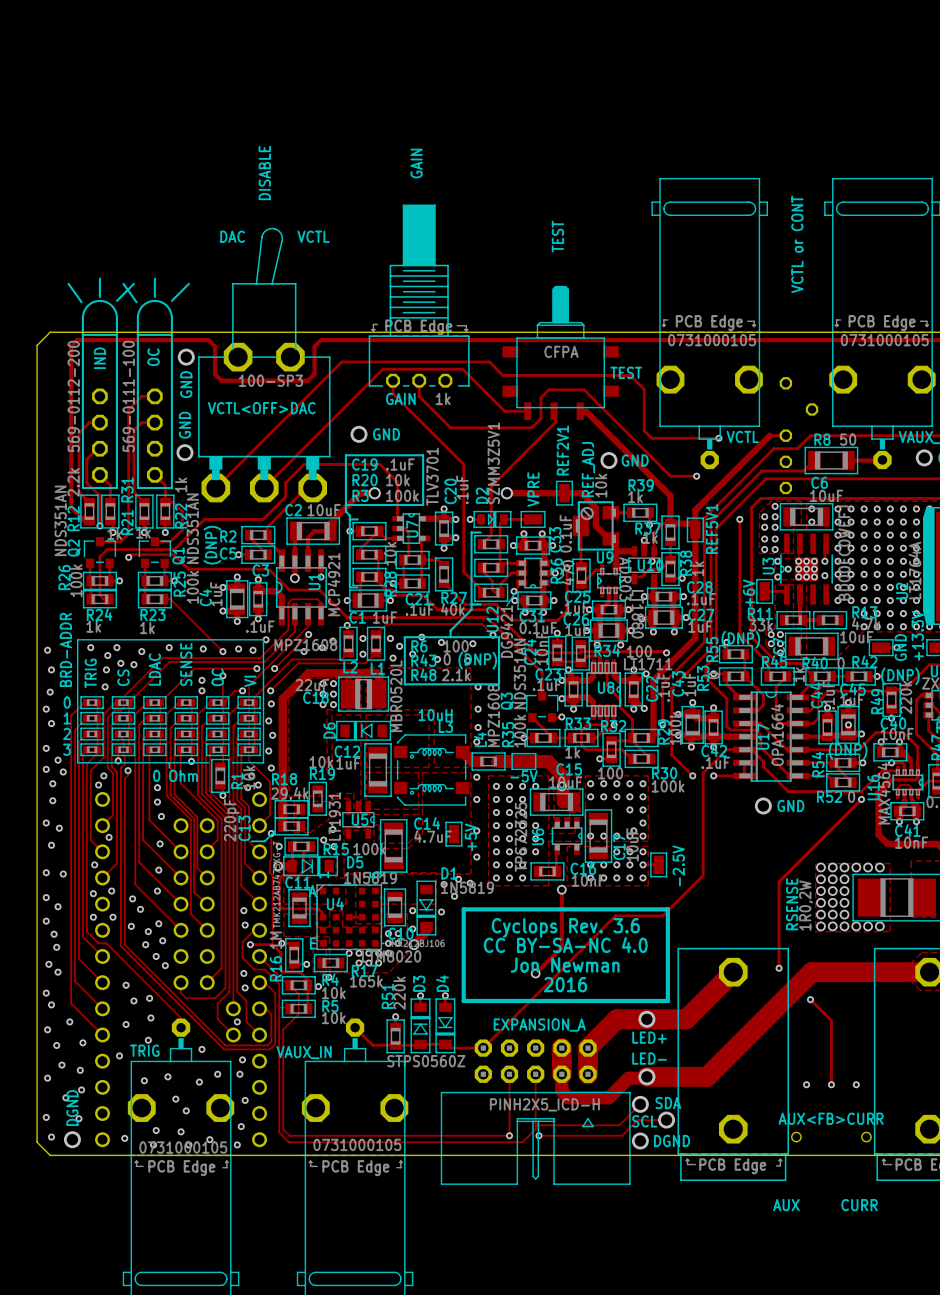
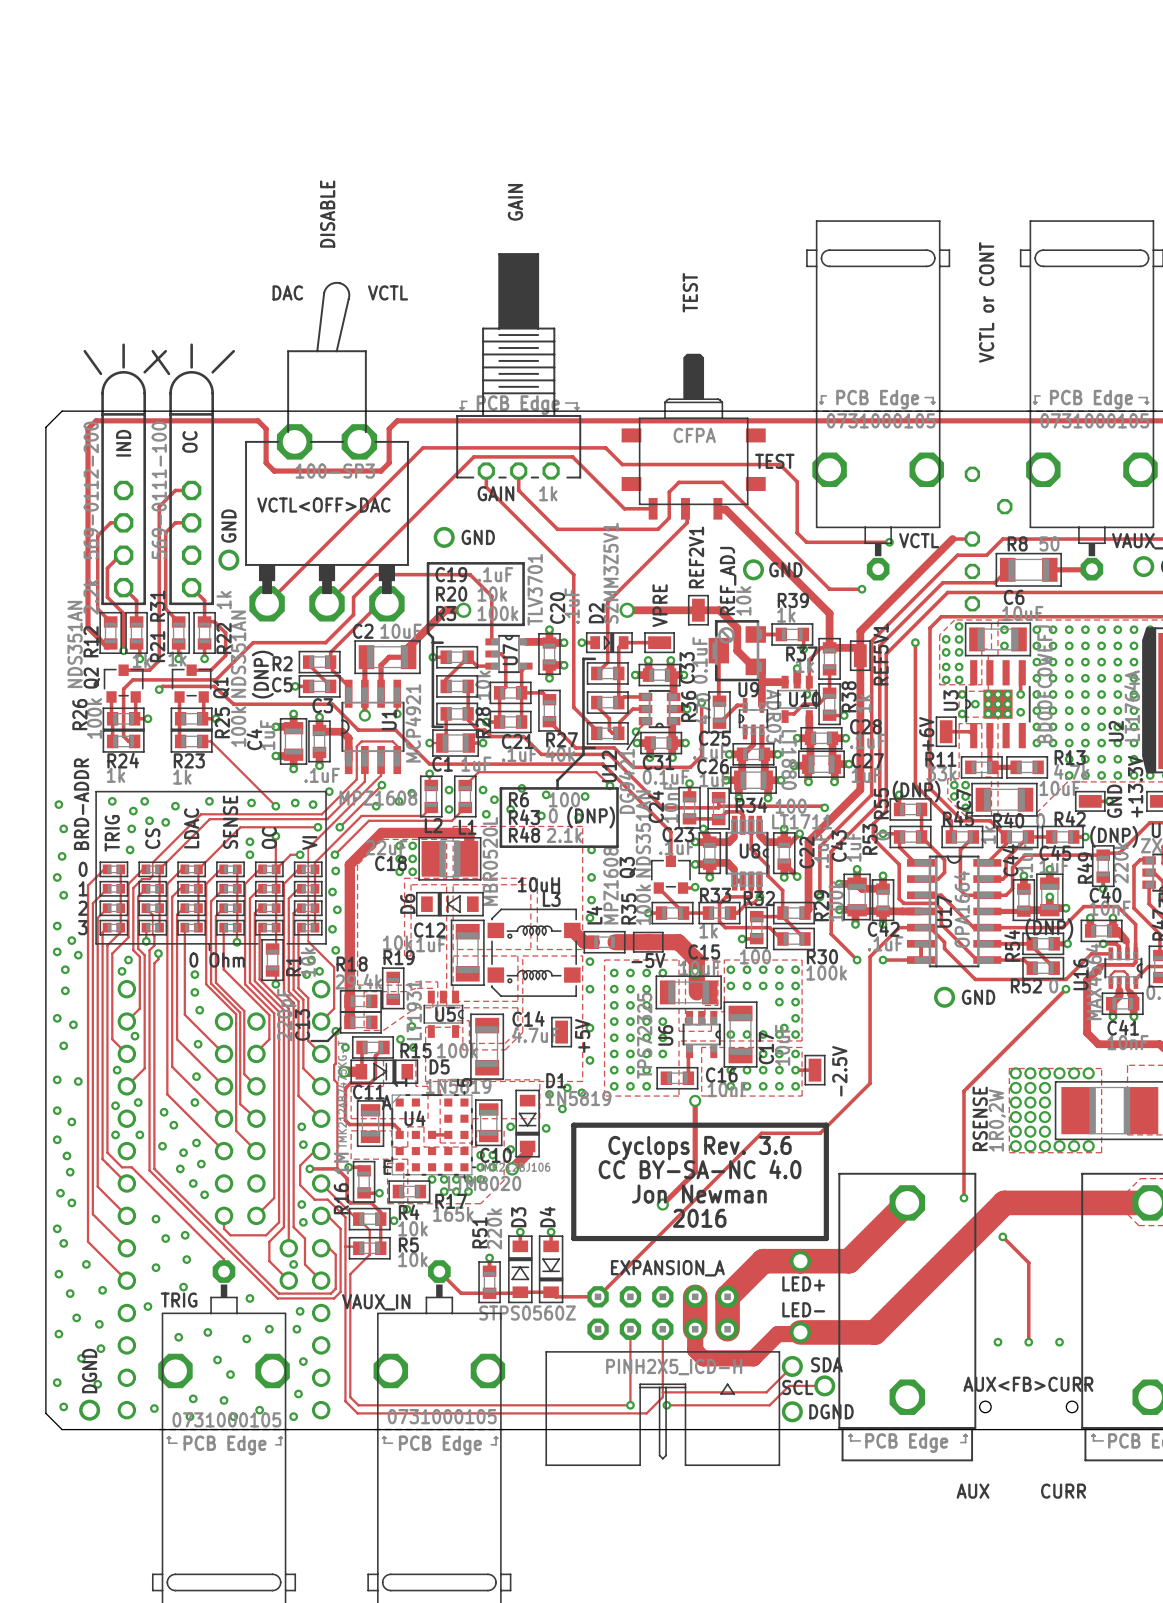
via: (186, 357) -> none
text: GND (186, 384) -> none

